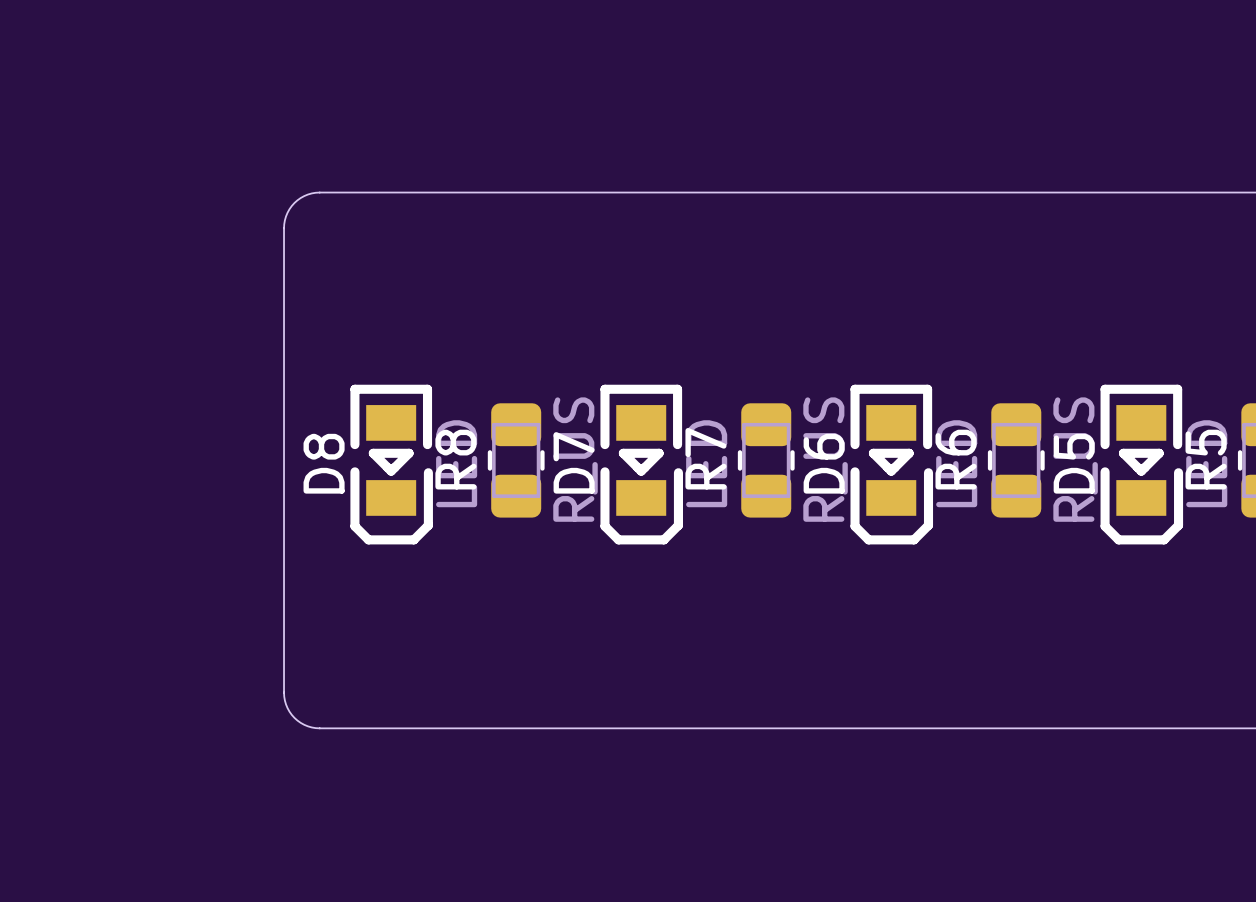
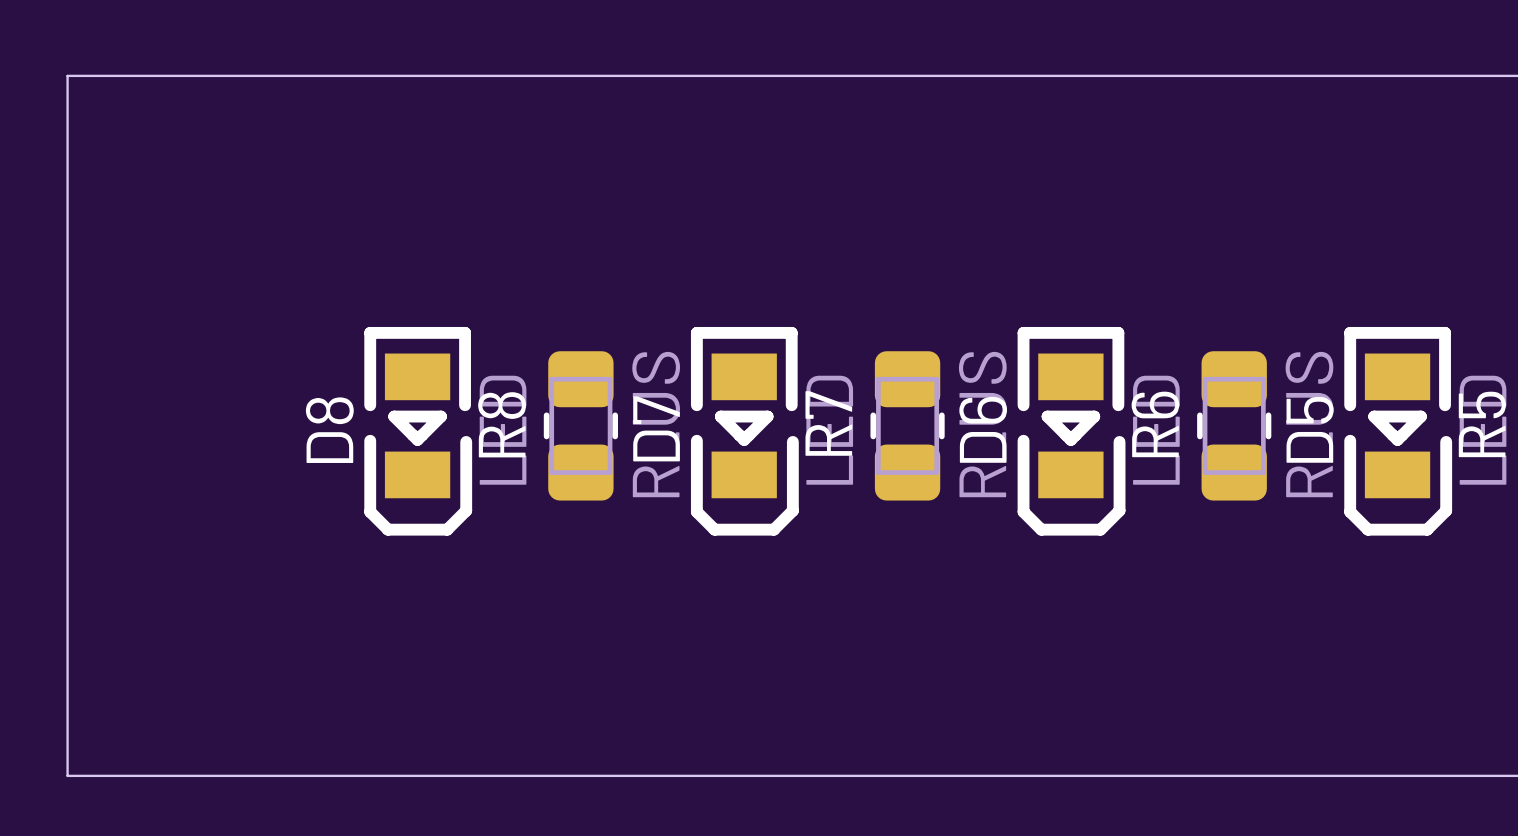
board edge: (319, 192) (304, 196) (294, 203) (287, 212) (284, 228) (284, 696) (289, 711) (297, 720) (307, 726) (319, 728) -> (324, 75) (67, 75) (67, 775) (324, 775)

